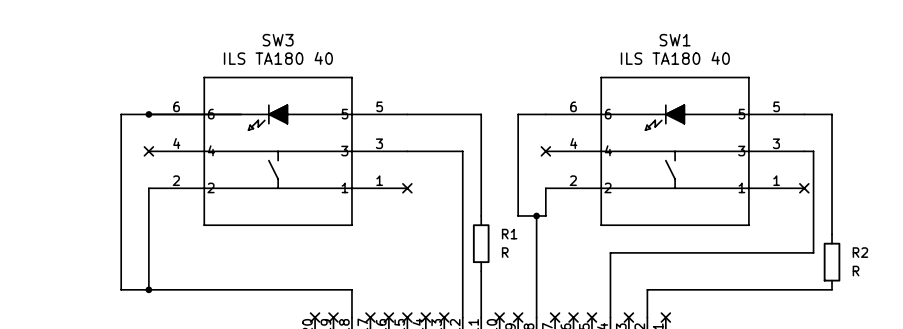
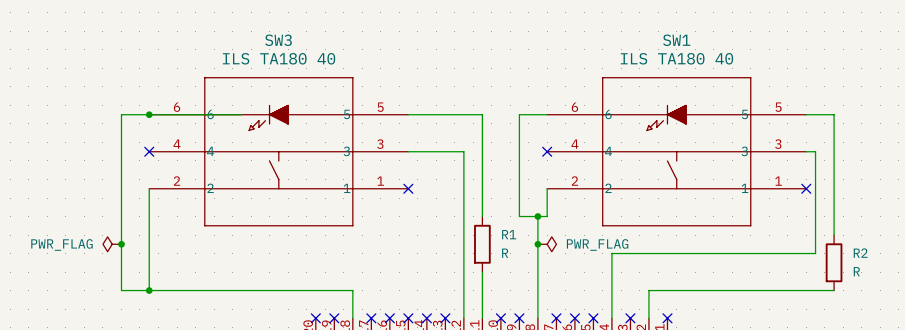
power symbol: none -> PWR_FLAG (112, 244)
junction: none -> (121, 244)
junction: none -> (537, 244)
power symbol: none -> PWR_FLAG (547, 244)

